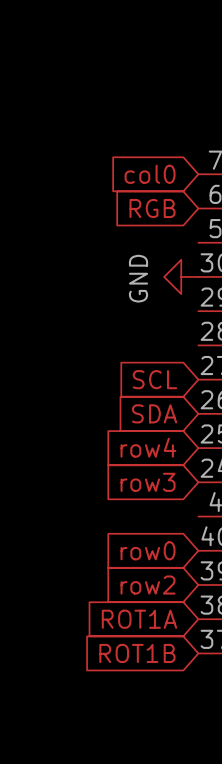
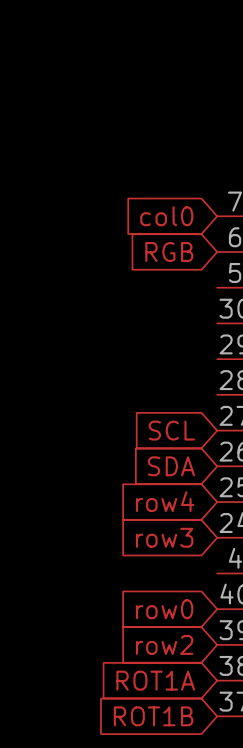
power symbol: GND (181, 276) -> none

